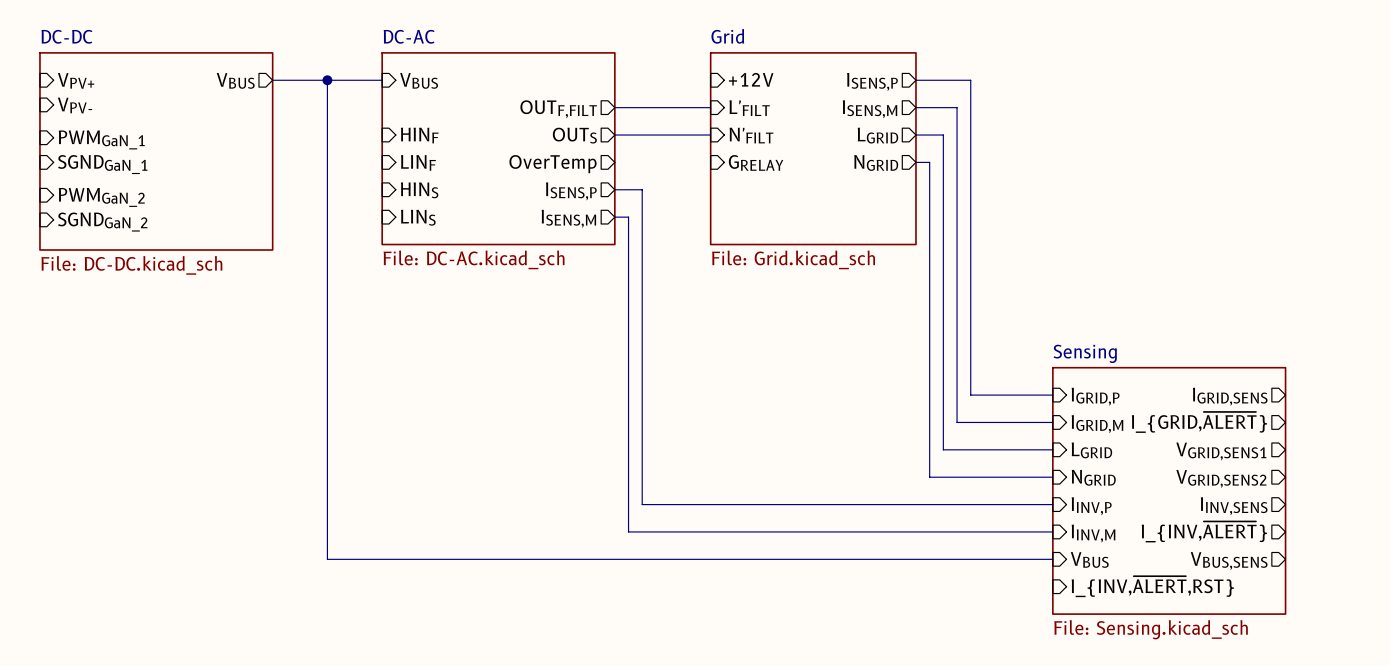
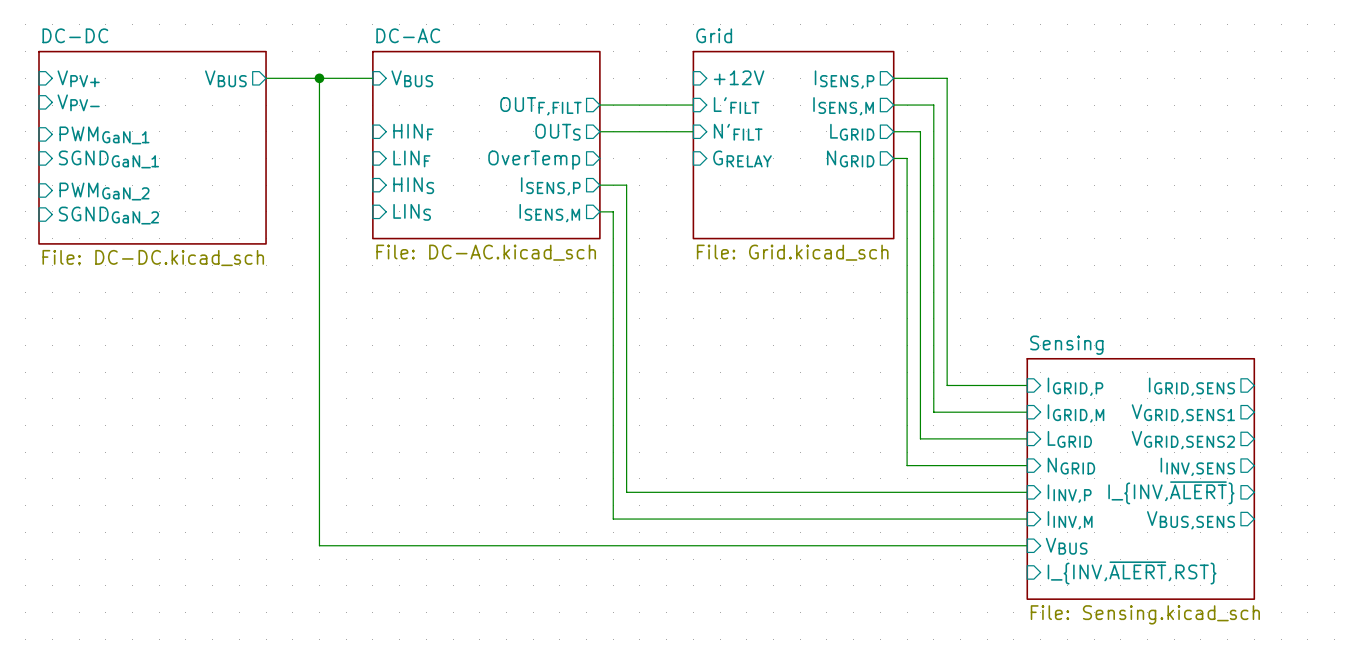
sheet pin: I_{GRID,~{ALERT}} (1199, 422) -> VGRID,SENS1 (1183, 413)
sheet pin: VGRID,SENS1 (1221, 451) -> VGRID,SENS2 (1183, 440)
sheet pin: VGRID,SENS2 (1221, 478) -> IINV,SENS (1197, 466)
sheet pin: IINV,SENS (1234, 506) -> I_{INV,~{ALERT}} (1171, 492)
sheet pin: I_{INV,~{ALERT}} (1204, 531) -> VBUS,SENS (1191, 520)
sheet pin: VBUS,SENS (1229, 560) -> none

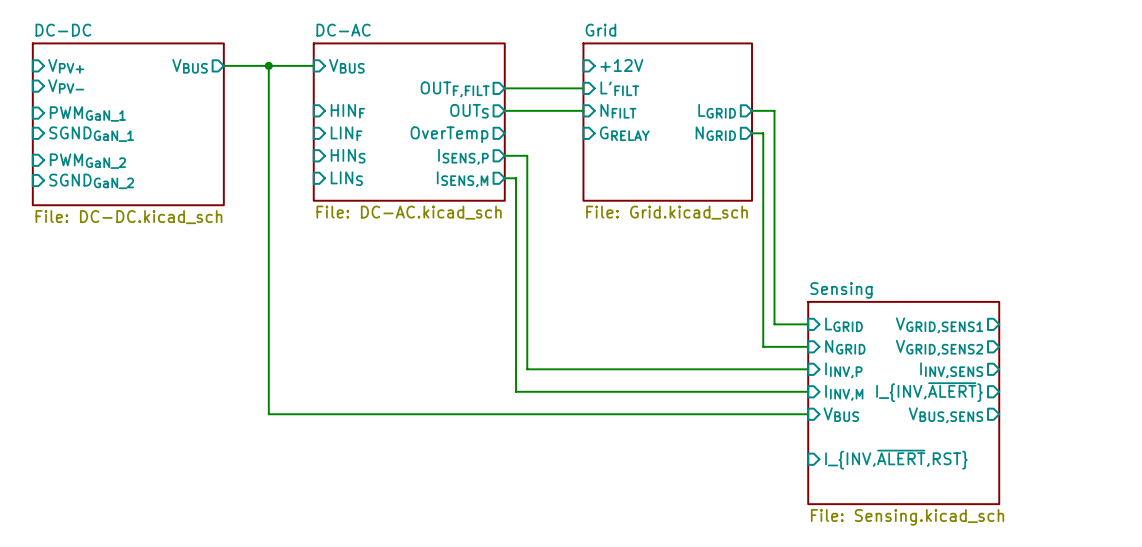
wire: (893, 78) (947, 78) (947, 385) -> none
sheet pin: ISENS,P (844, 79) -> none
wire: (893, 105) (933, 105) (933, 412) -> none
sheet pin: ISENS,M (843, 106) -> none
sheet pin: N'FILT (738, 132) -> NFILT (618, 111)
wire: (920, 385) (920, 438) -> (774, 324) (796, 324)
wire: (960, 385) (1027, 385) -> none
sheet pin: IGRID,P (1075, 386) -> none
sheet pin: IGRID,SENS (1191, 386) -> none
wire: (907, 412) (907, 465) -> (763, 346) (785, 346)
wire: (960, 412) (1027, 412) -> none
sheet pin: IGRID,M (1076, 413) -> none
sheet pin position: VGRID,SENS1 (1183, 413) -> VGRID,SENS1 (939, 325)
wire: (626, 438) (626, 492) -> (527, 369) (774, 369)
wire: (960, 438) (1027, 438) -> none
sheet pin position: LGRID (1069, 439) -> LGRID (844, 324)
sheet pin position: VGRID,SENS2 (1183, 440) -> VGRID,SENS2 (939, 347)
wire: (613, 465) (613, 519) (1027, 519) -> (516, 391) (763, 391)
wire: (960, 465) (1027, 465) -> none
sheet pin position: NGRID (1071, 466) -> NGRID (845, 347)
sheet pin position: IINV,SENS (1197, 466) -> IINV,SENS (951, 370)
sheet Sensing position: (1140, 478) -> (903, 403)
wire: (319, 492) (319, 545) (1027, 545) -> (268, 414) (527, 414)
wire: (960, 492) (1027, 492) -> none
sheet pin position: I_{INV,~{ALERT}} (1171, 492) -> I_{INV,~{ALERT}} (929, 392)
sheet pin position: IINV,P (1069, 493) -> IINV,P (843, 370)
sheet pin position: IINV,M (1070, 520) -> IINV,M (844, 392)
sheet pin position: VBUS,SENS (1191, 520) -> VBUS,SENS (945, 415)
sheet pin position: VBUS (1066, 546) -> VBUS (841, 414)
sheet pin position: I_{INV,~{ALERT},RST} (1132, 572) -> I_{INV,~{ALERT},RST} (896, 459)

